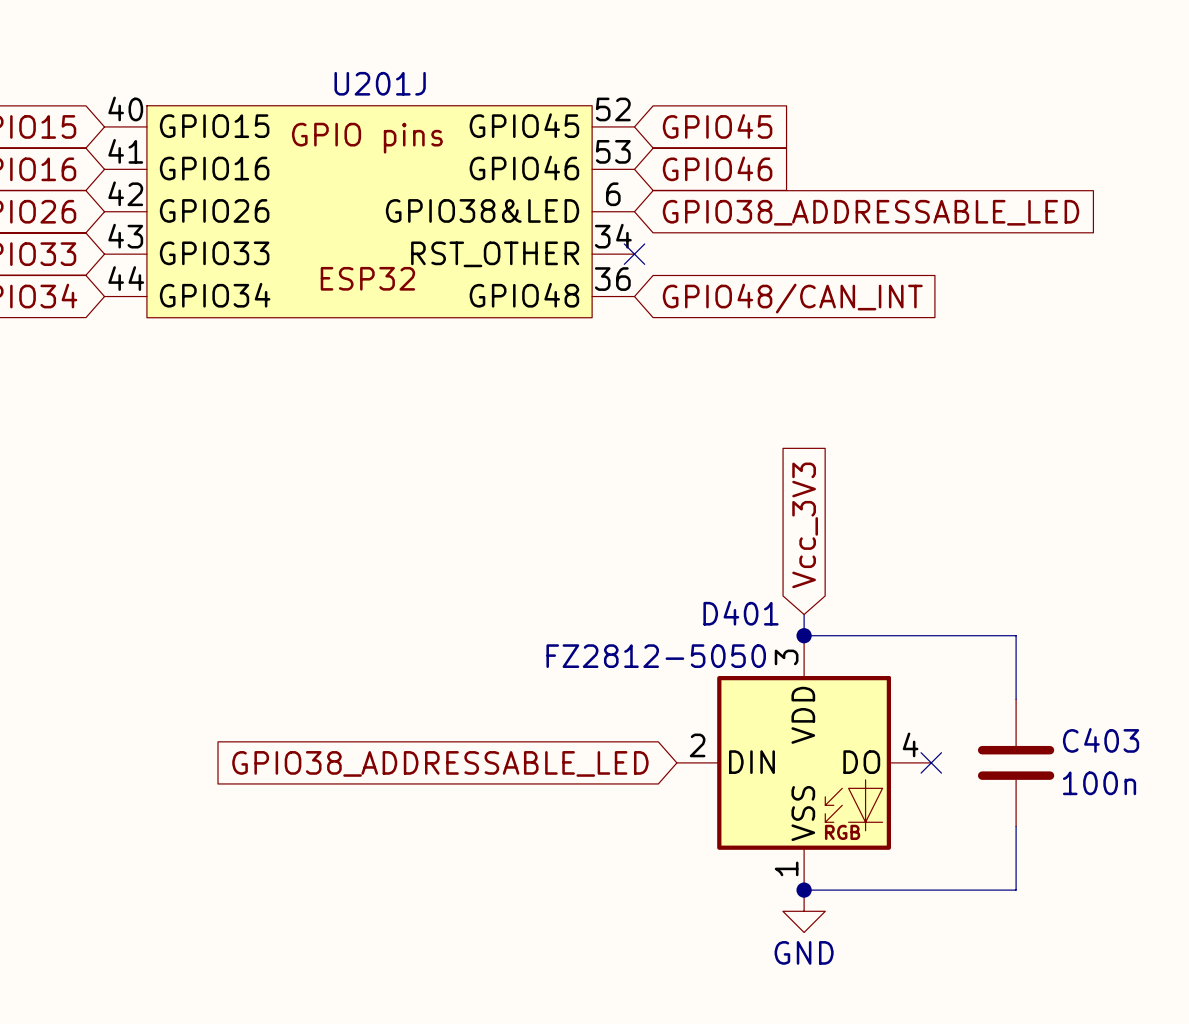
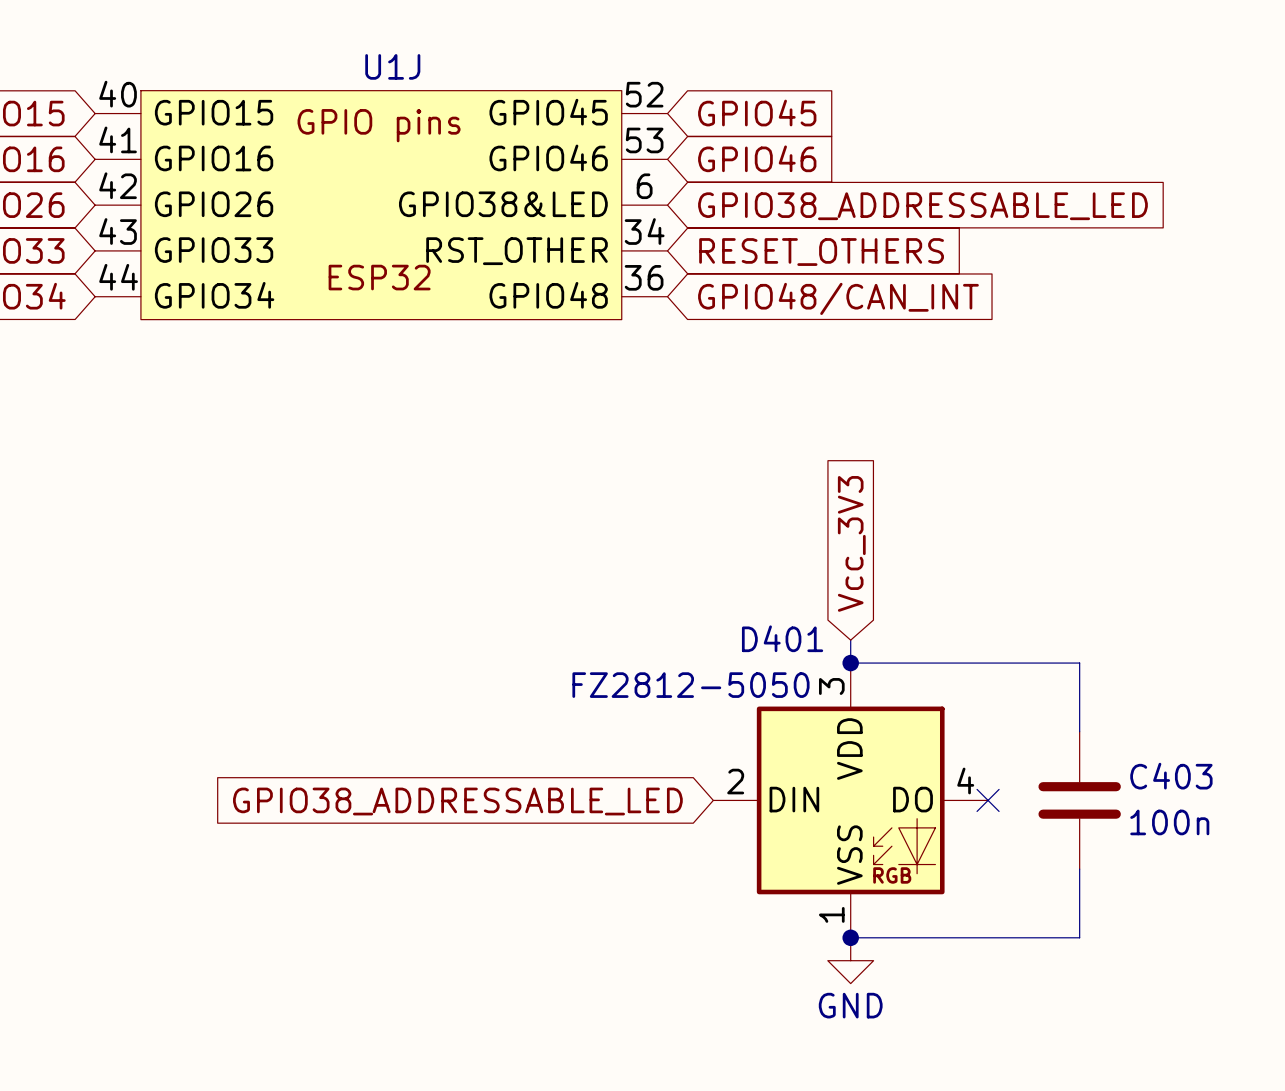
U201J name: U201J (380, 83) -> U1J (392, 66)
no-connect mark: (634, 254) -> none
global label: none -> RESET_OTHERS (821, 252)

